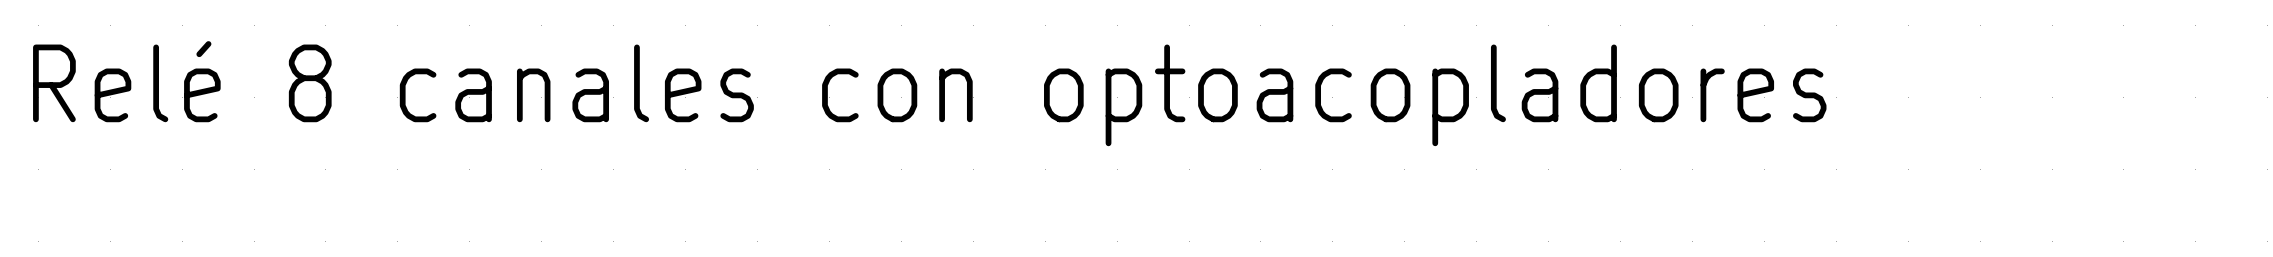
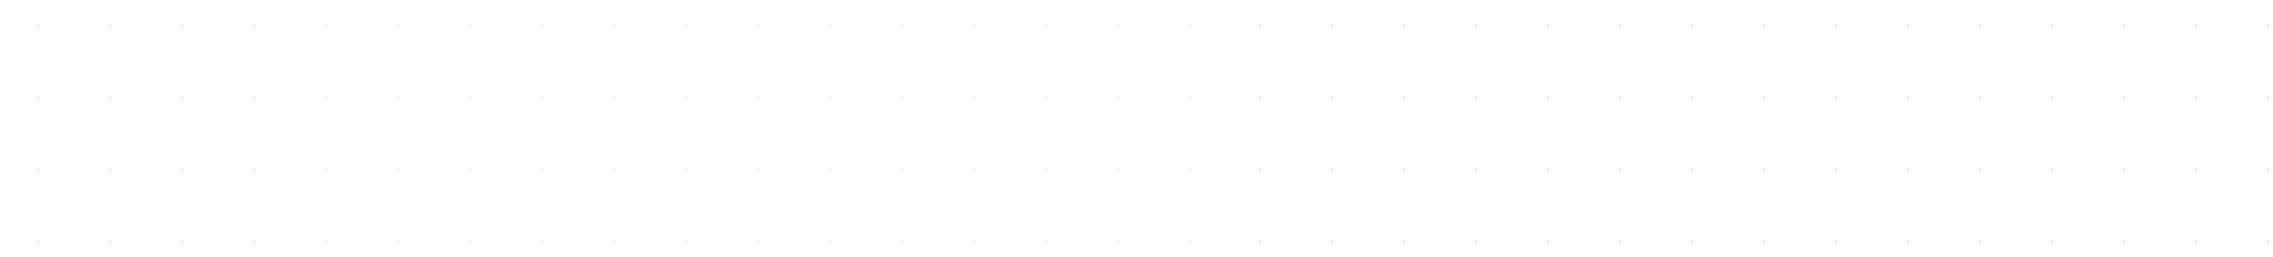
text: Relé 8 canales con optoacopladores (929, 93) -> none

